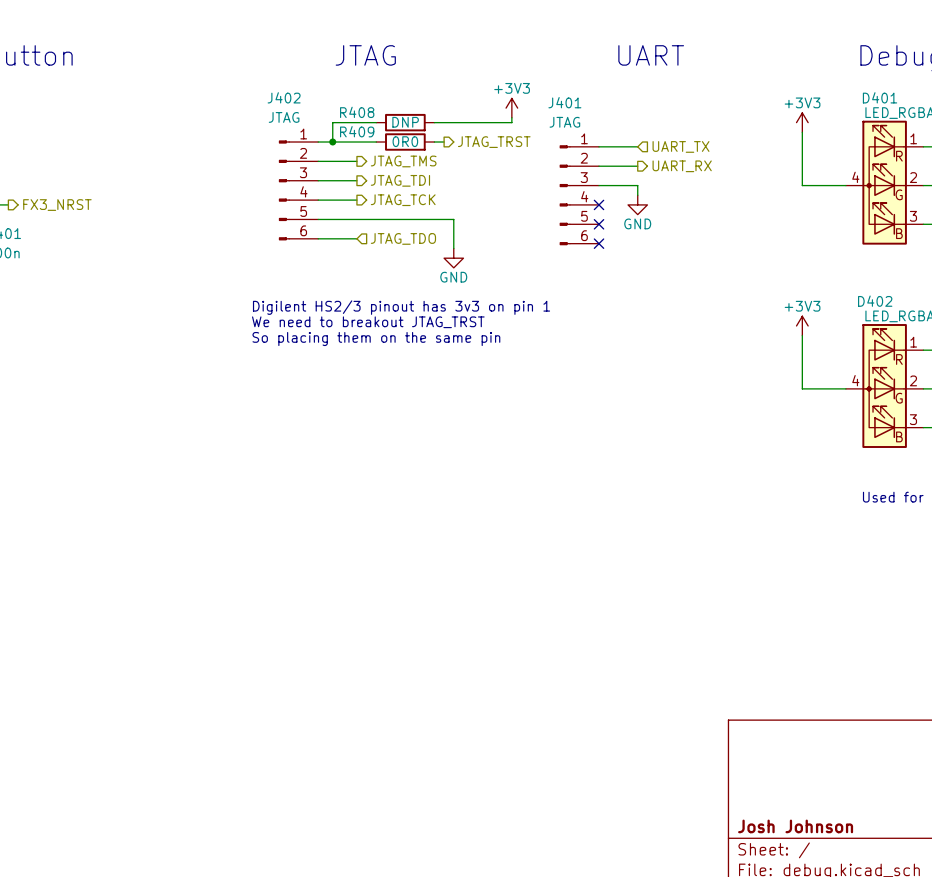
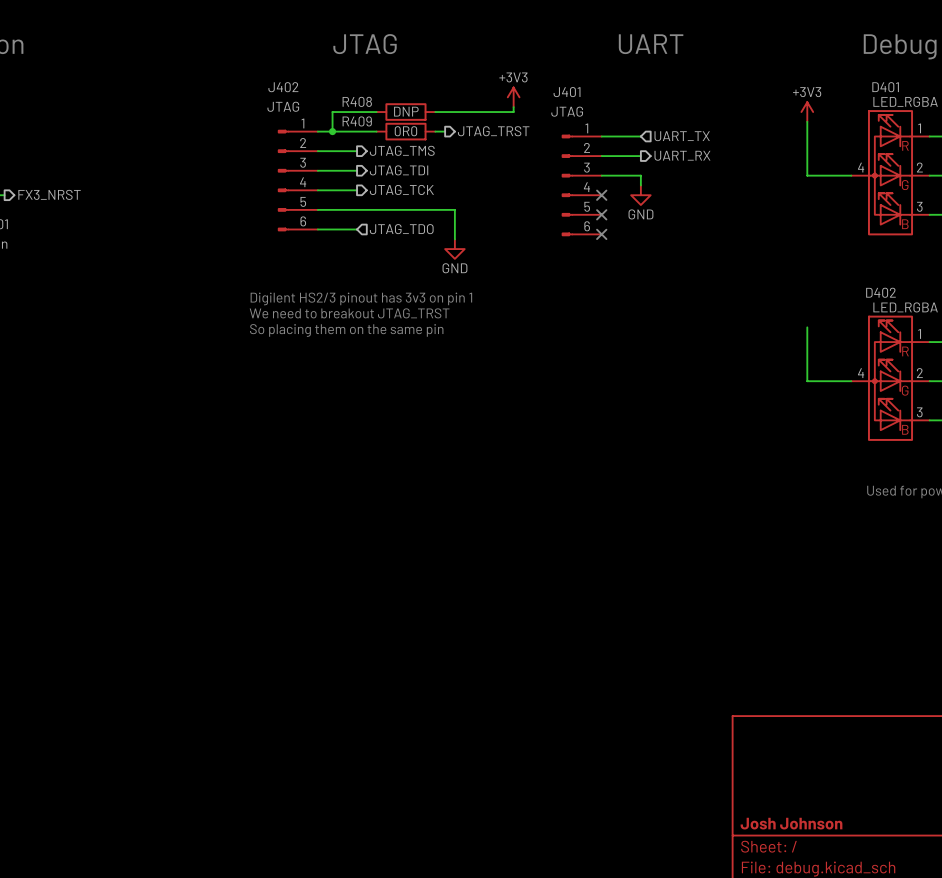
power symbol: +3V3 (802, 325) -> none

